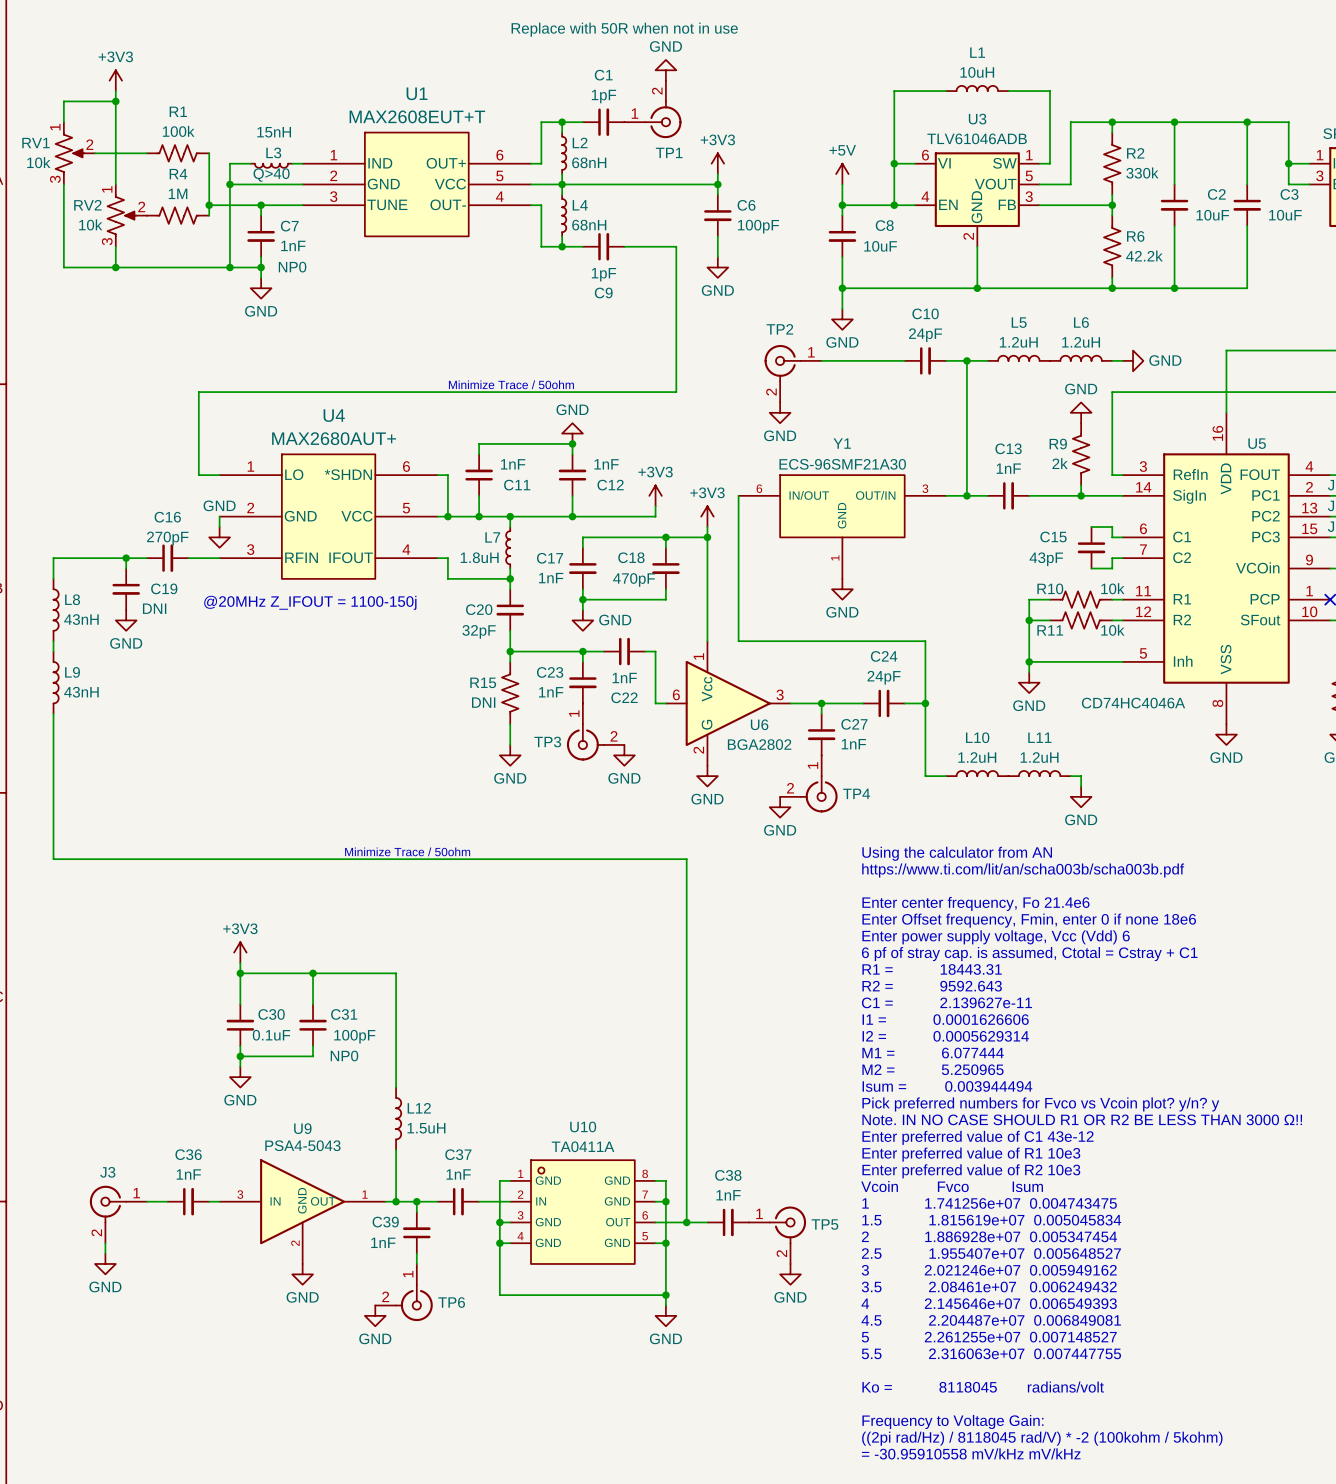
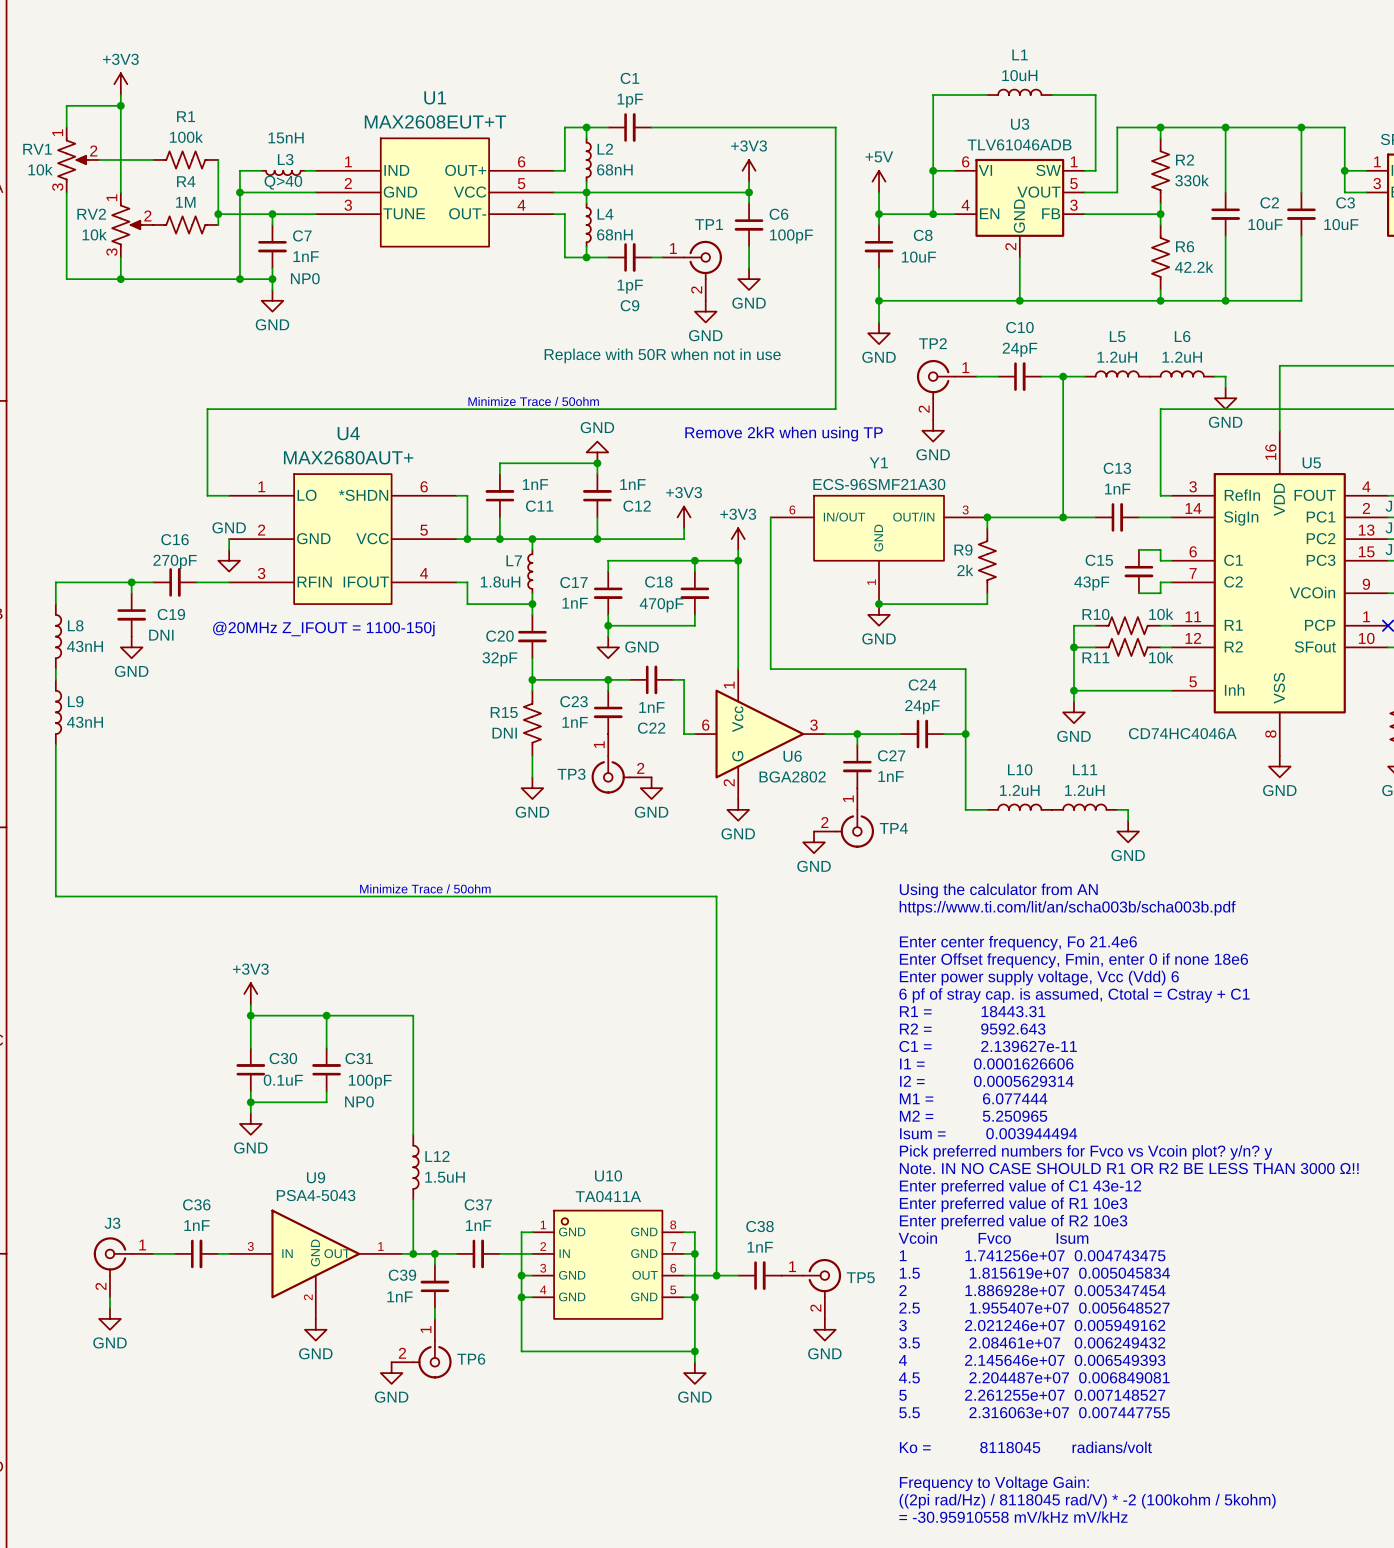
power symbol: GND (665, 70) -> none
TP1 position: (652, 109) -> (692, 270)
TP1 flip: as is (663, 119) -> up-down (703, 259)
wire: (634, 246) (676, 246) (676, 392) -> (651, 127) (835, 127) (835, 409) (705, 409)
power symbol: none -> GND (705, 311)
L5 position: (1018, 358) -> (1117, 373)
L6 position: (1081, 358) -> (1182, 373)
wire: (821, 360) (904, 360) -> none
C10 position: (925, 360) -> (1019, 376)
wire: (966, 360) (966, 495) -> (1063, 376) (1063, 517)
junction: (966, 360) -> none
wire: none -> (1041, 376) (1084, 376)
junction: none -> (1063, 376)
power symbol rotation: 0° (1133, 360) -> 90° clockwise (1225, 398)
power symbol position: GND (1133, 360) -> GND (1225, 398)
wire: none -> (1214, 376) (1225, 376) (1225, 387)
TP2 position: (793, 373) -> (946, 389)
power symbol: GND (780, 412) -> none
power symbol: none -> GND (933, 430)
power symbol: GND (1081, 412) -> none
text: none -> Remove 2kR when using TP (784, 434)
R9 position: (1081, 454) -> (987, 560)
wire: (1081, 485) (1081, 495) -> (987, 517) (987, 528)
junction position: (966, 495) -> (987, 517)
C13 position: (1008, 495) -> (1117, 517)
junction: none -> (1063, 517)
junction: (1081, 495) -> none
wire: none -> (987, 593) (987, 604) (879, 604)
junction: none -> (879, 604)

